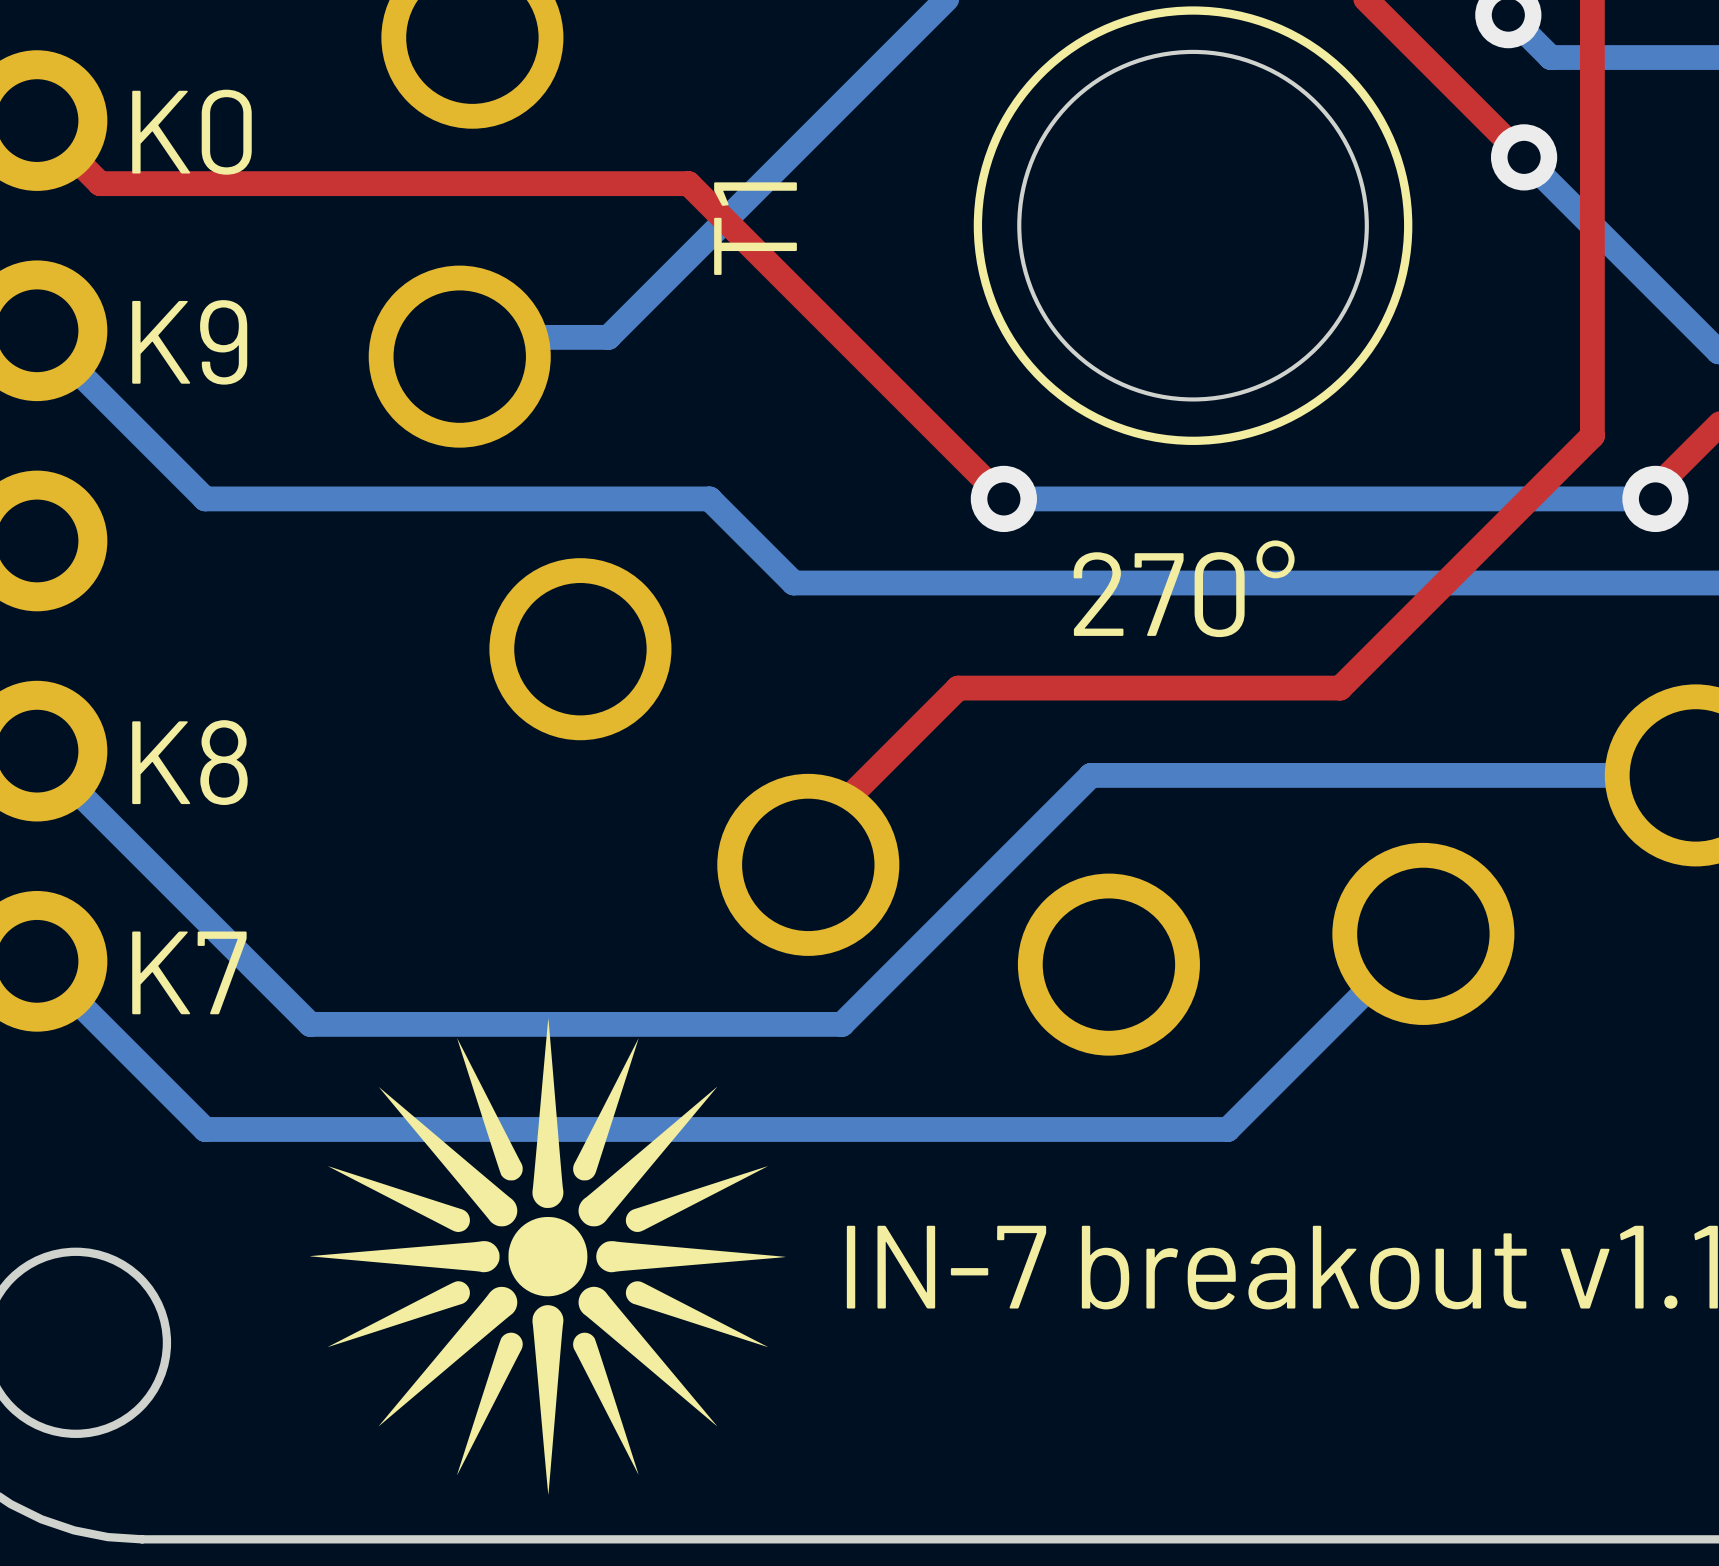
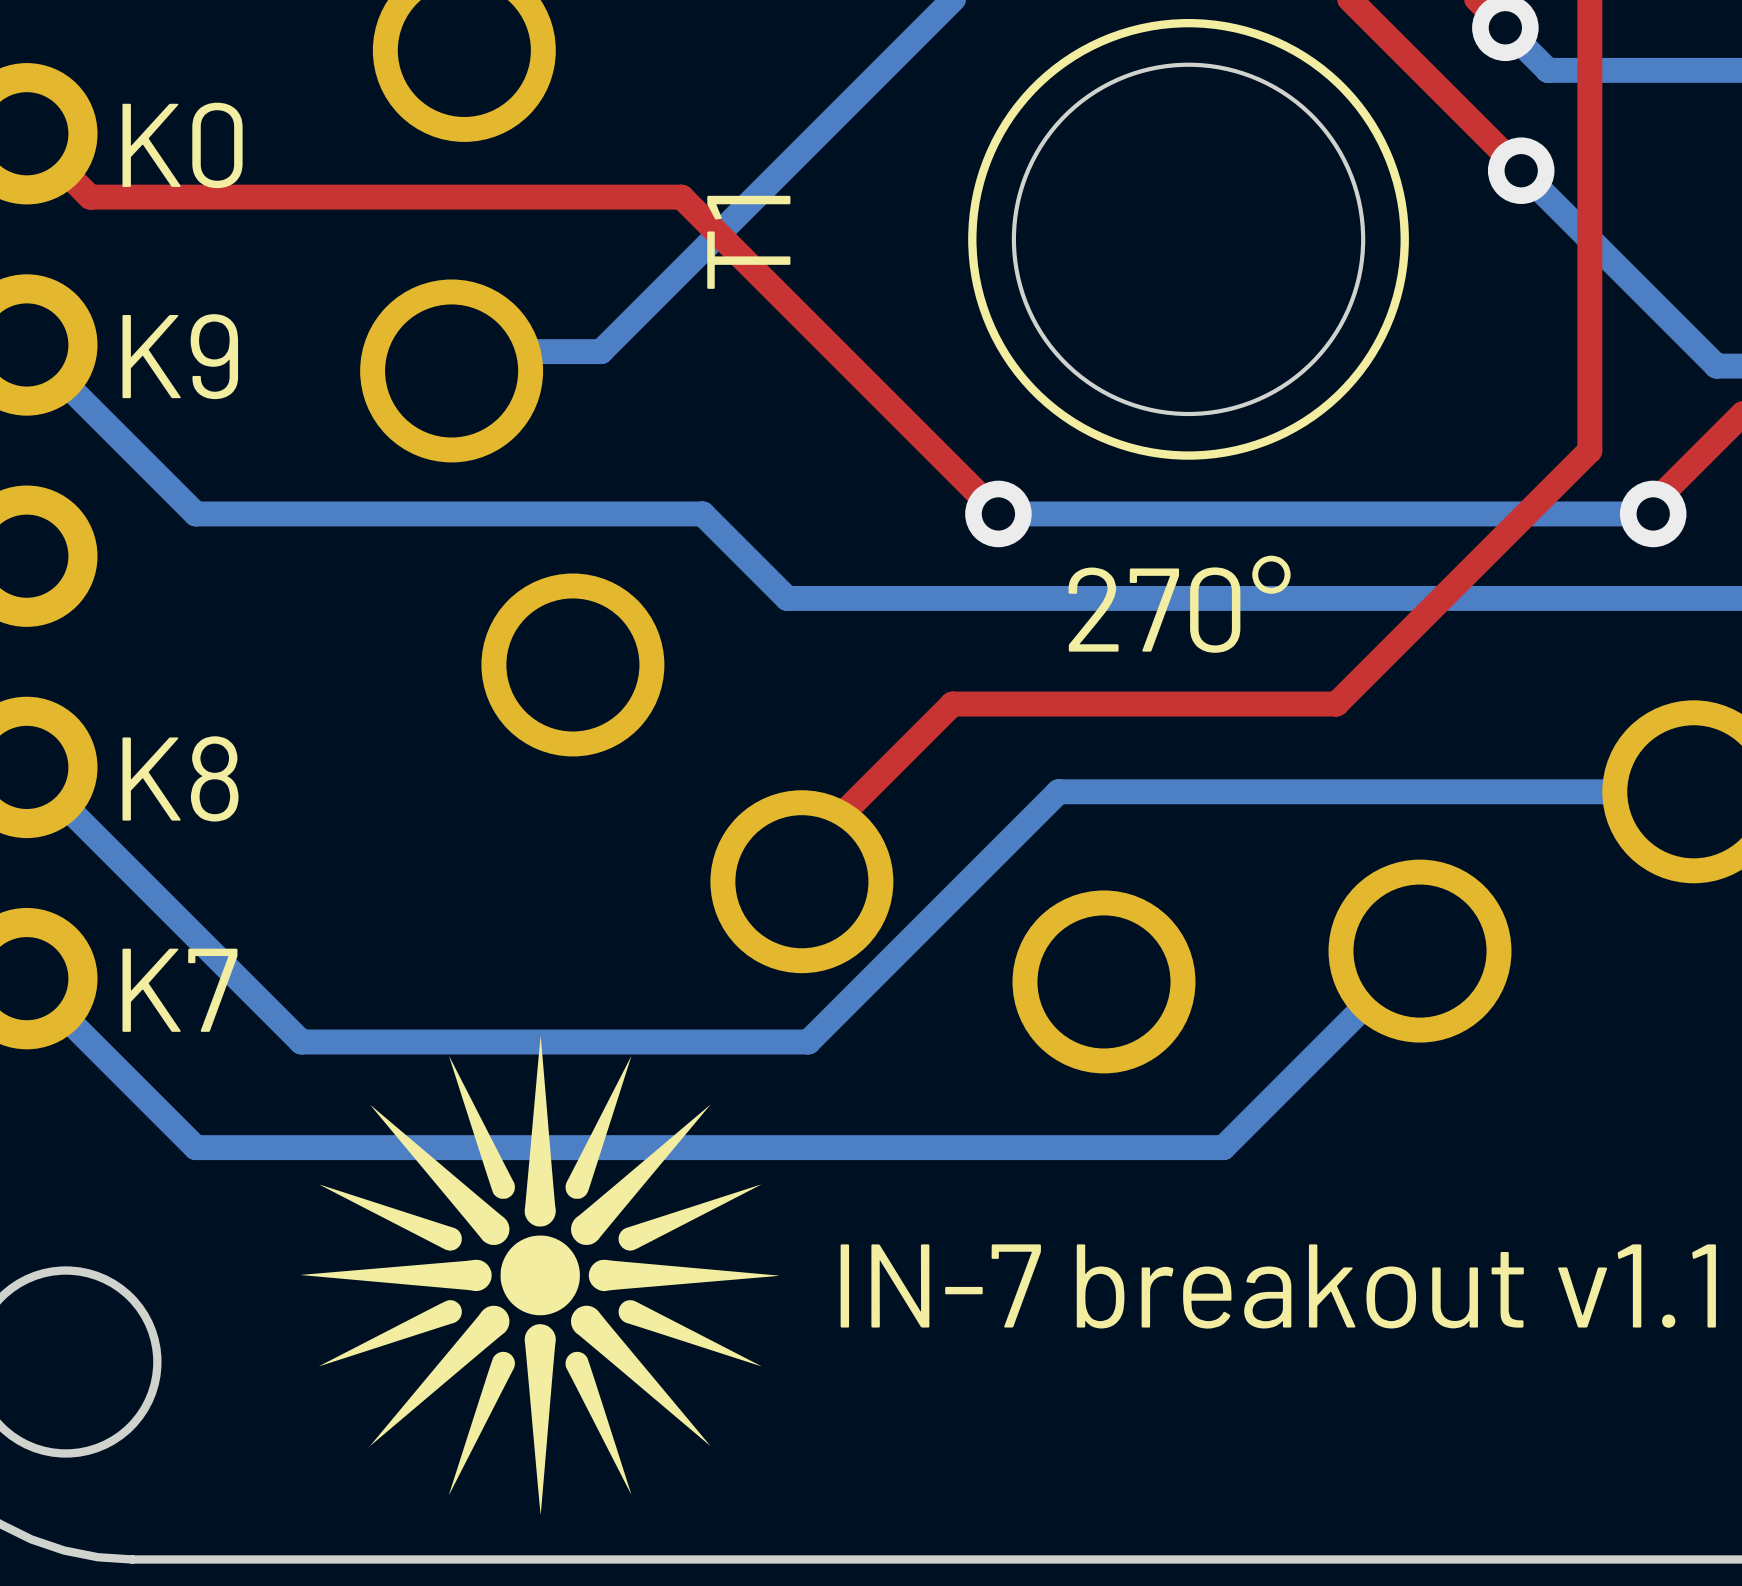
bottom track: (1090, 775) (842, 1024) (814, 1024) -> (1085, 791) (1058, 791) (808, 1042)

